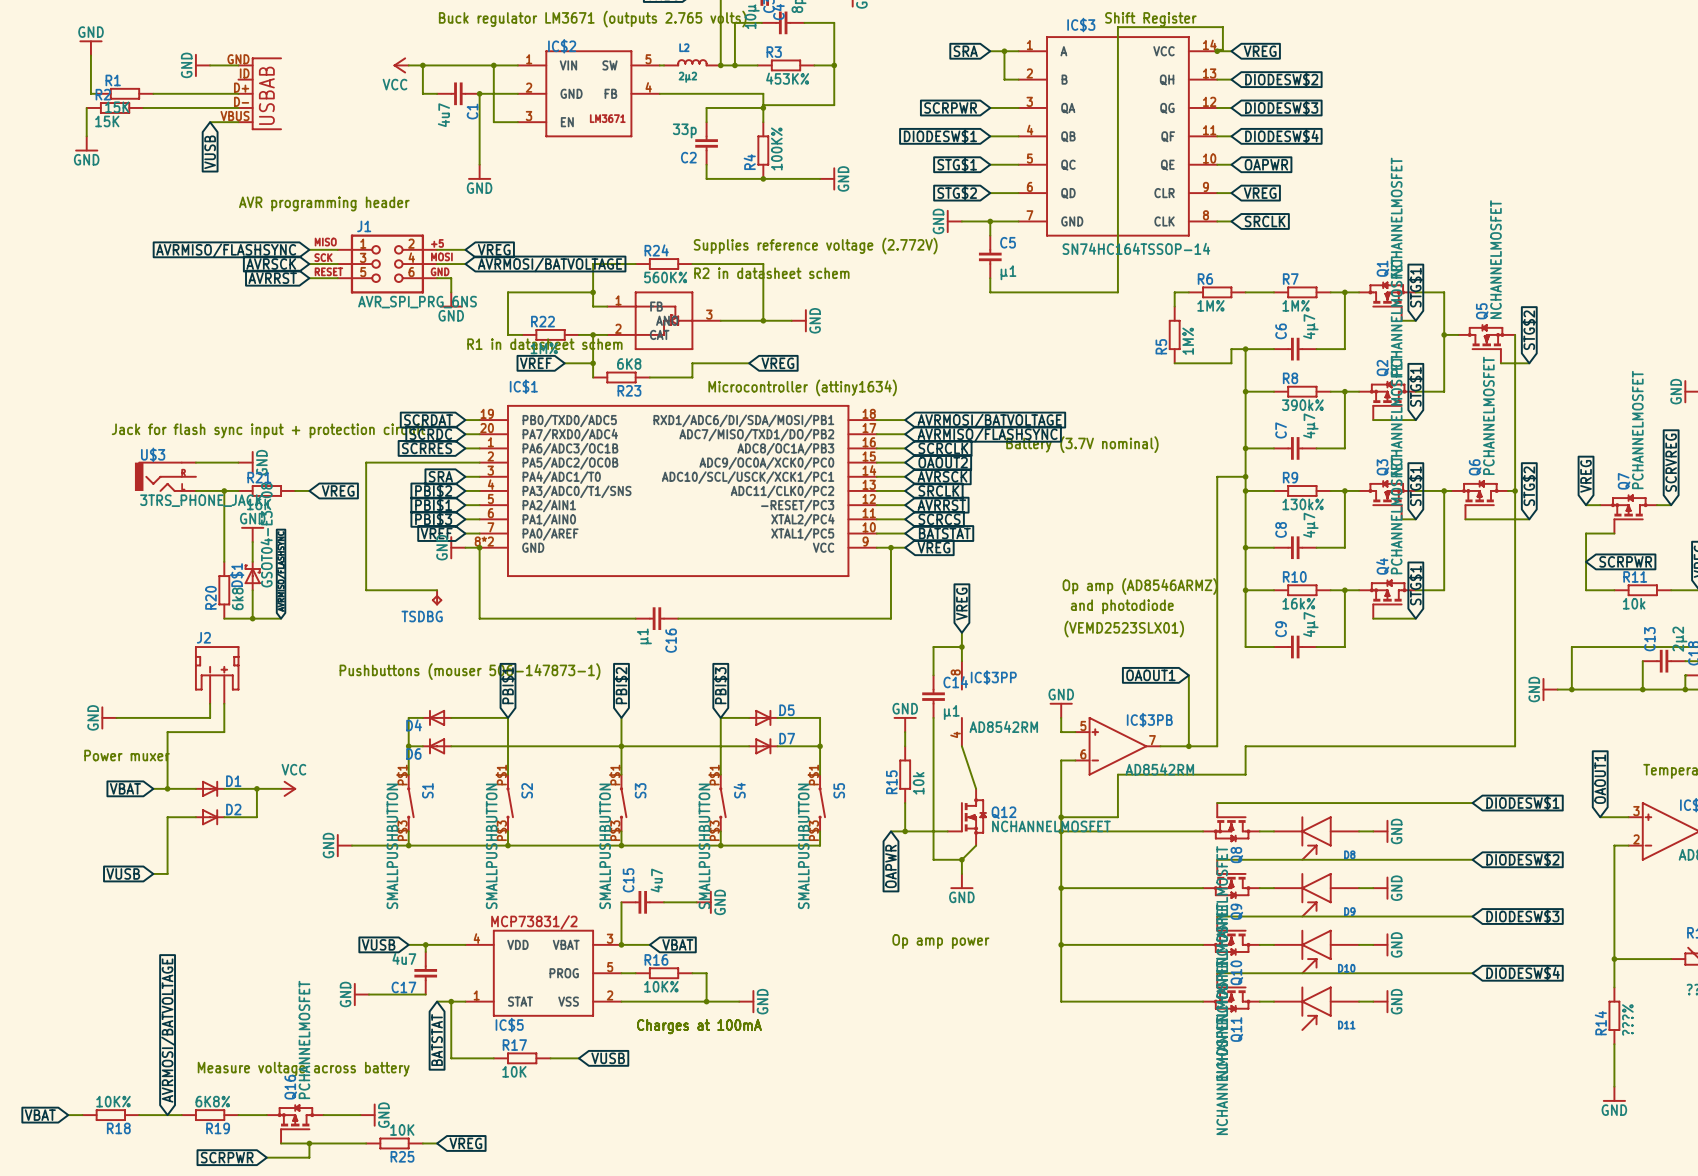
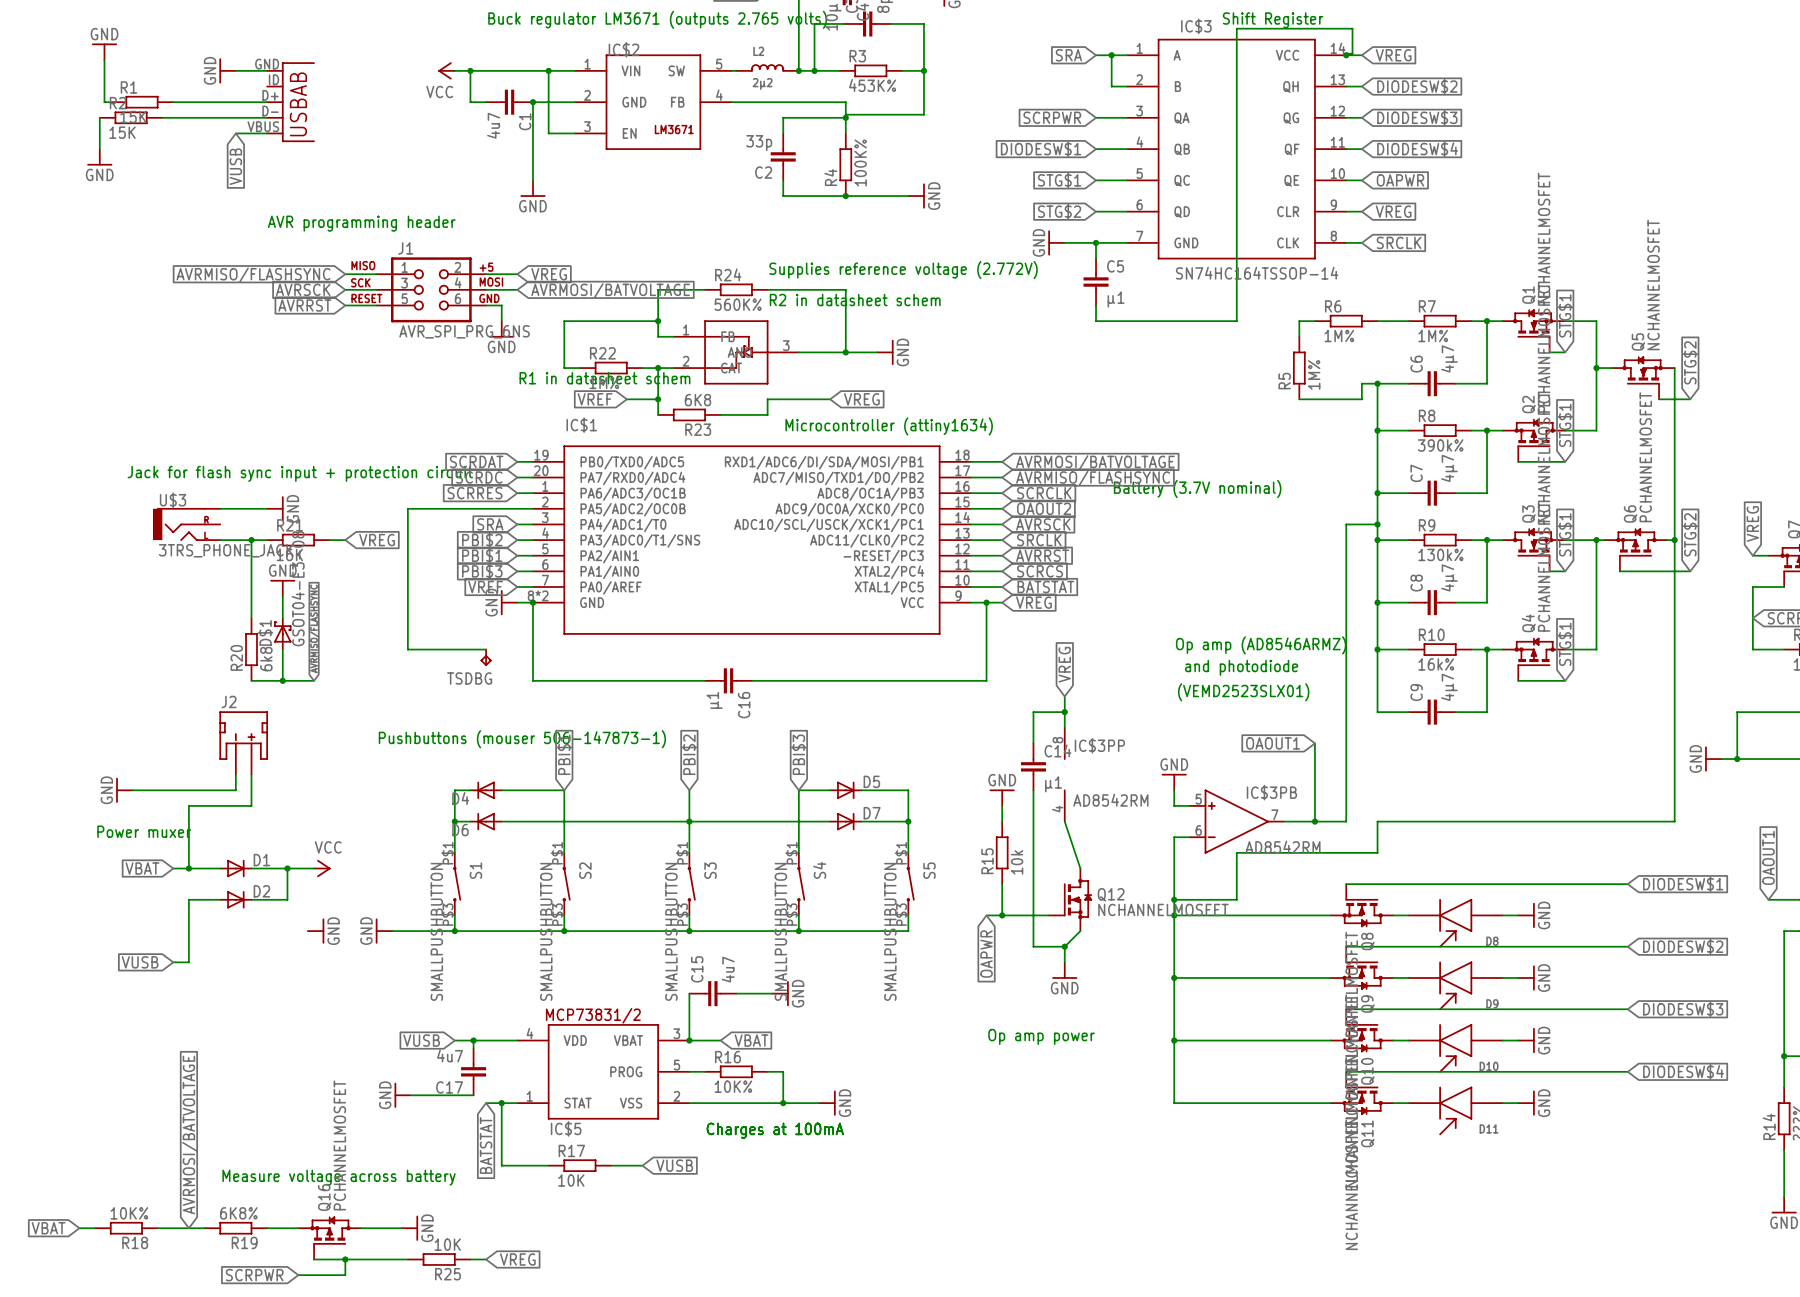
power symbol: none -> GND (316, 931)

